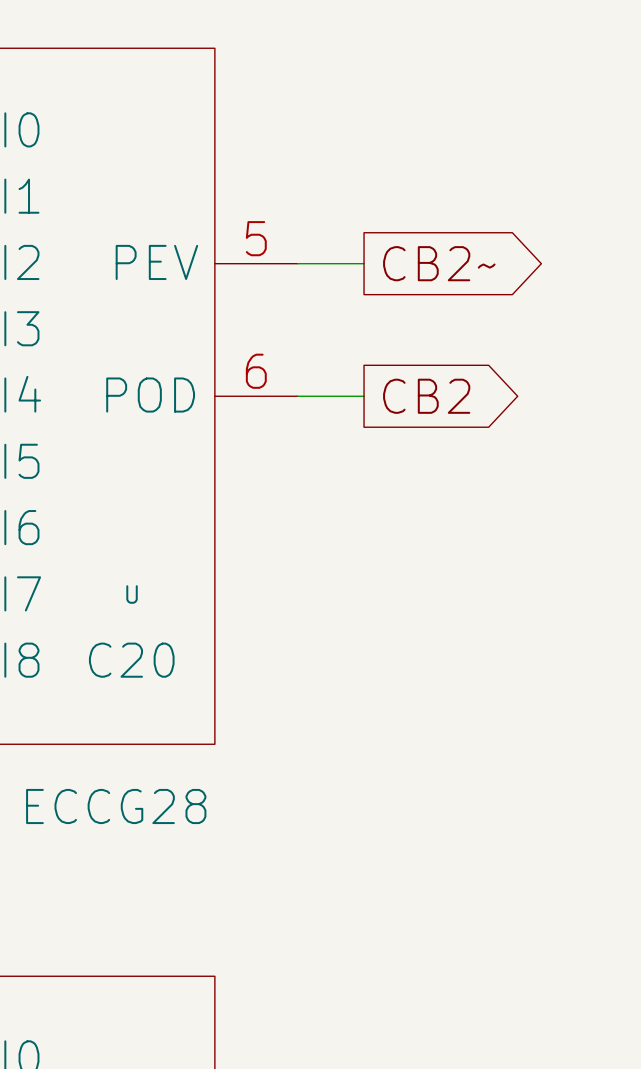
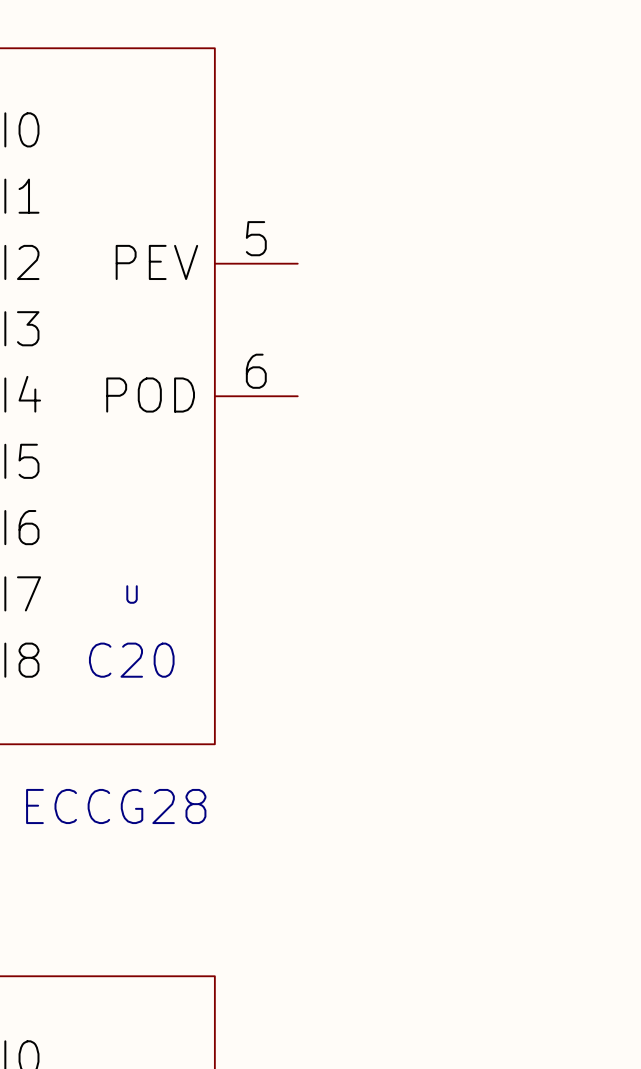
wire: (297, 263) (364, 263) -> none
global label: CB2~ (439, 263) -> none
wire: (297, 396) (364, 396) -> none
global label: CB2 (426, 396) -> none

